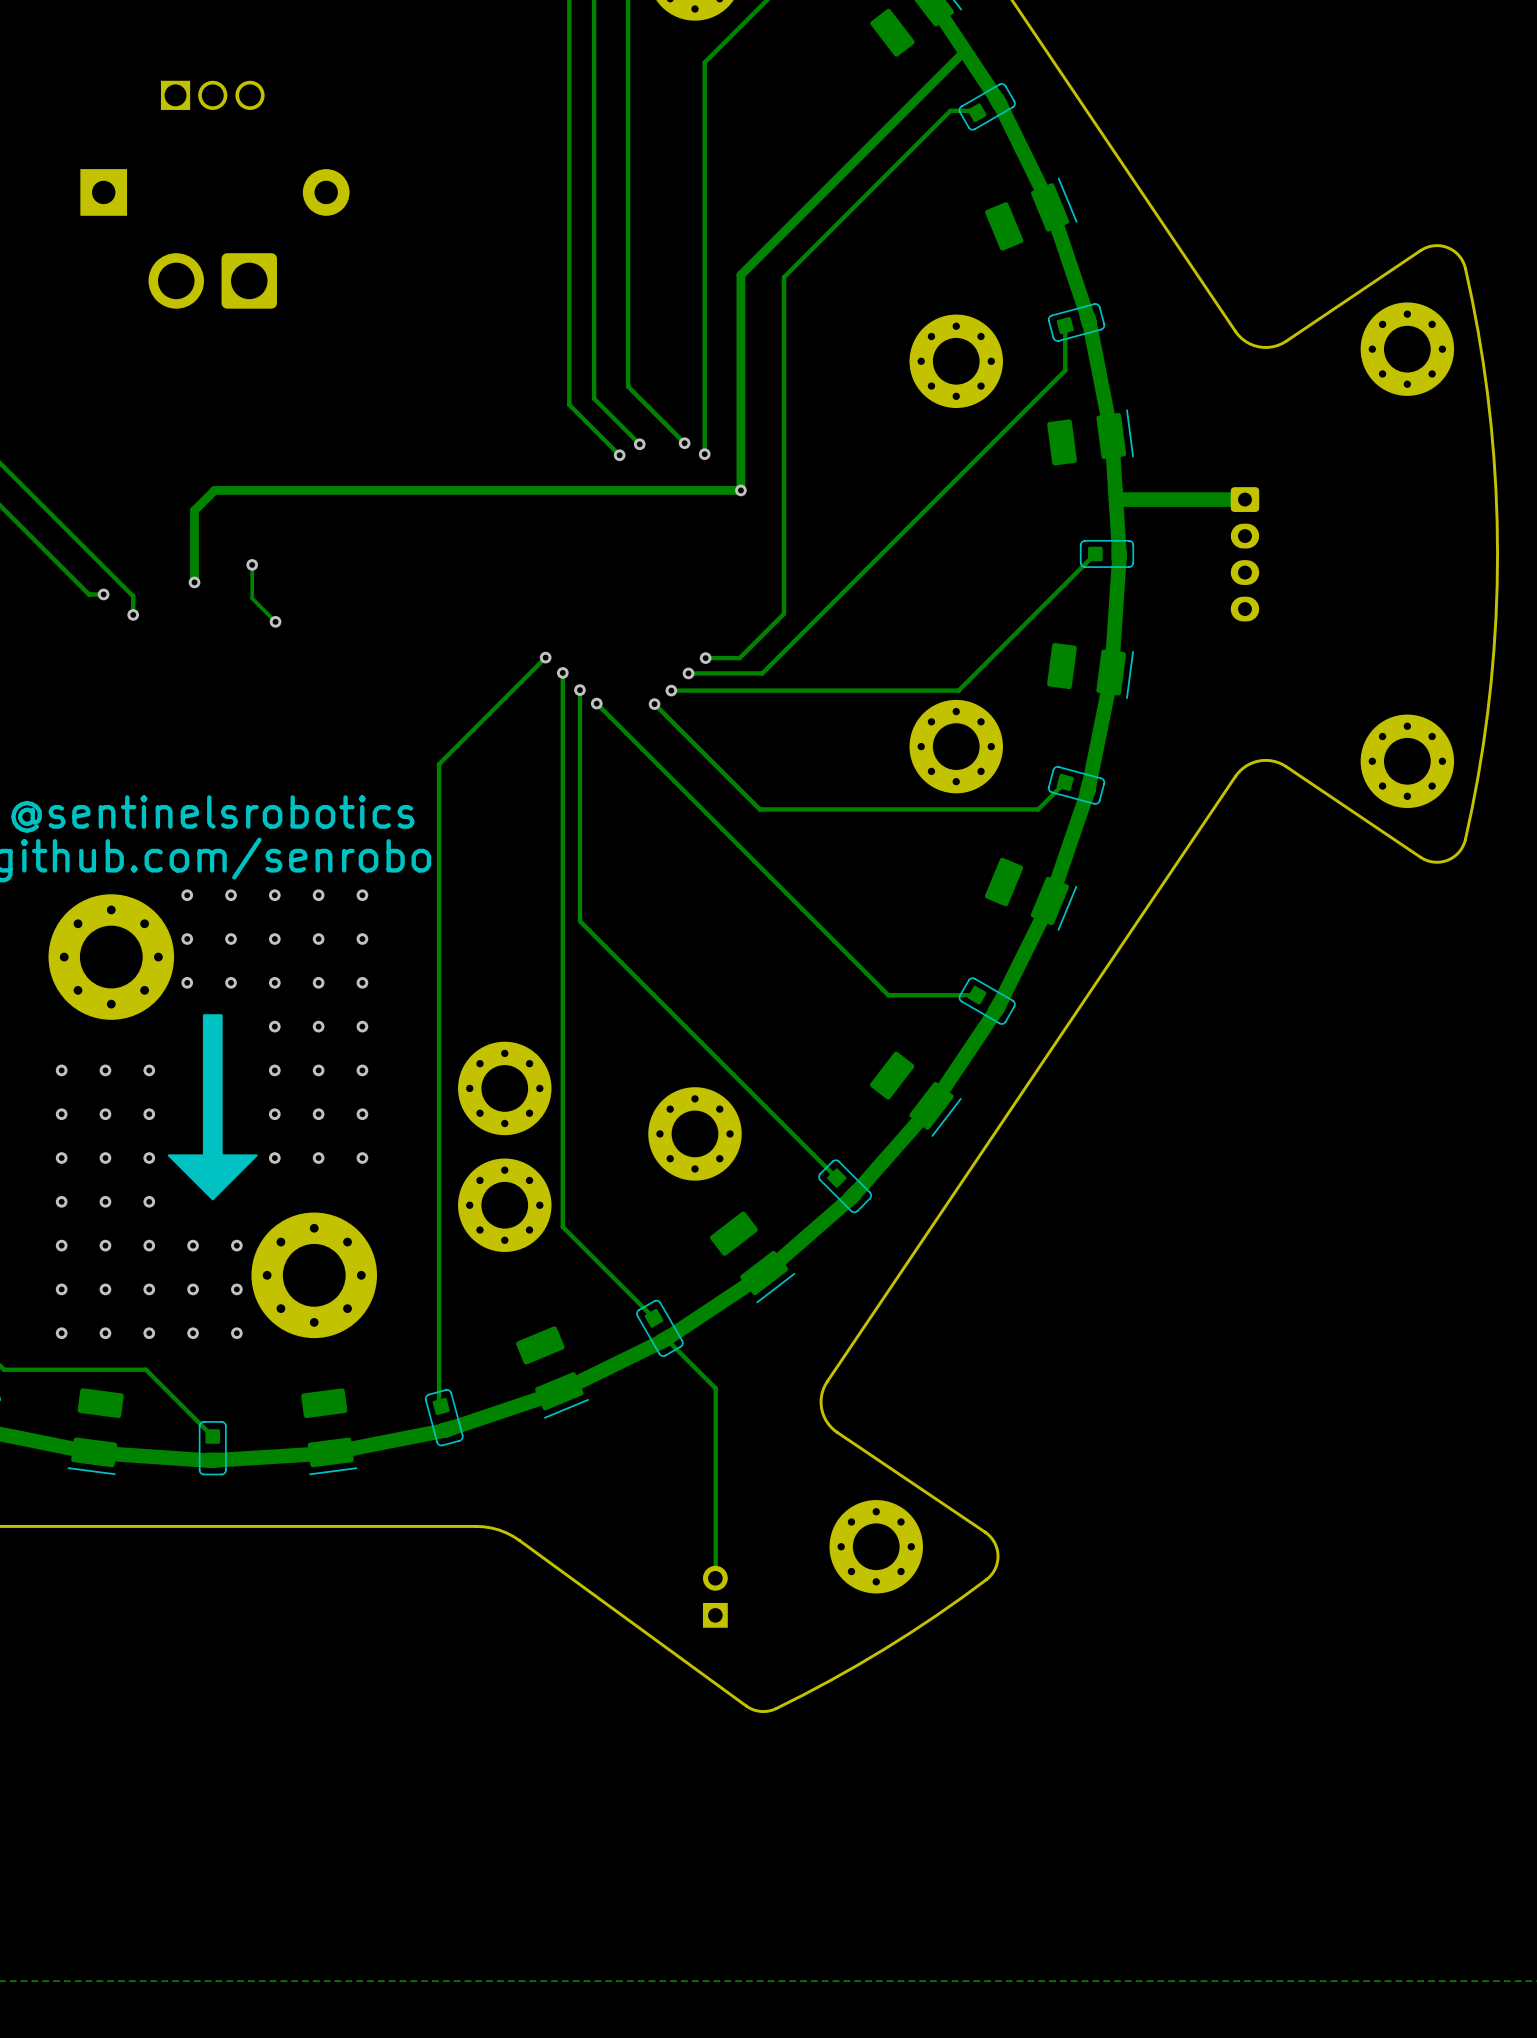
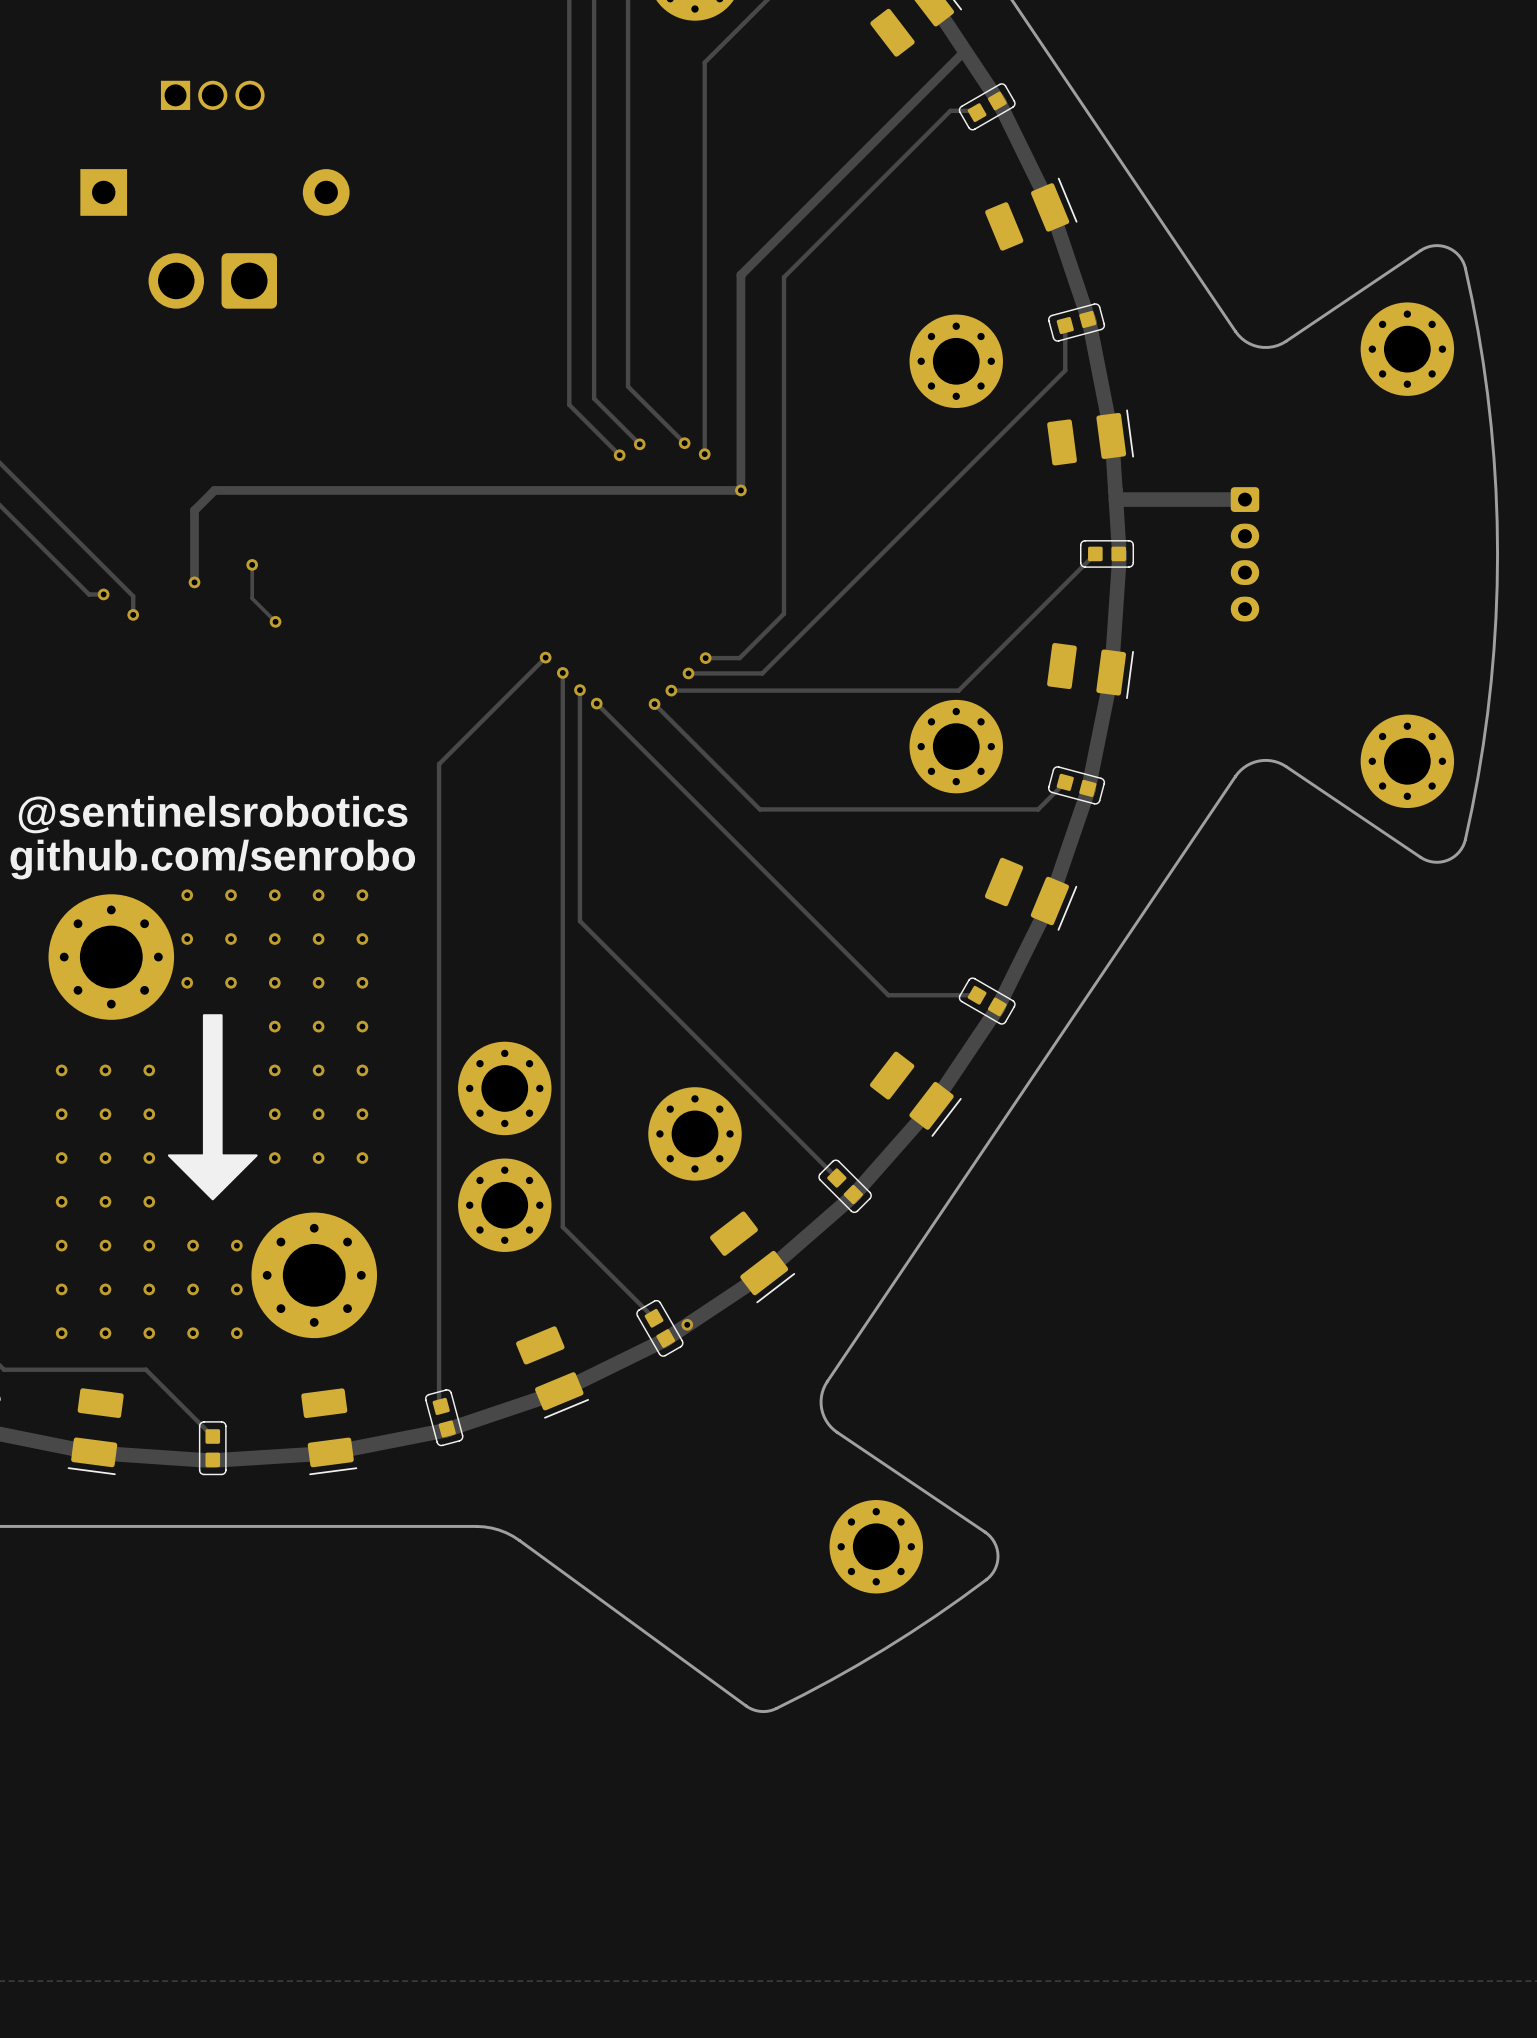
via: none -> (687, 1324)
track: (665, 1338) (715, 1388) (715, 1580) -> none
part: (715, 1596) -> none

